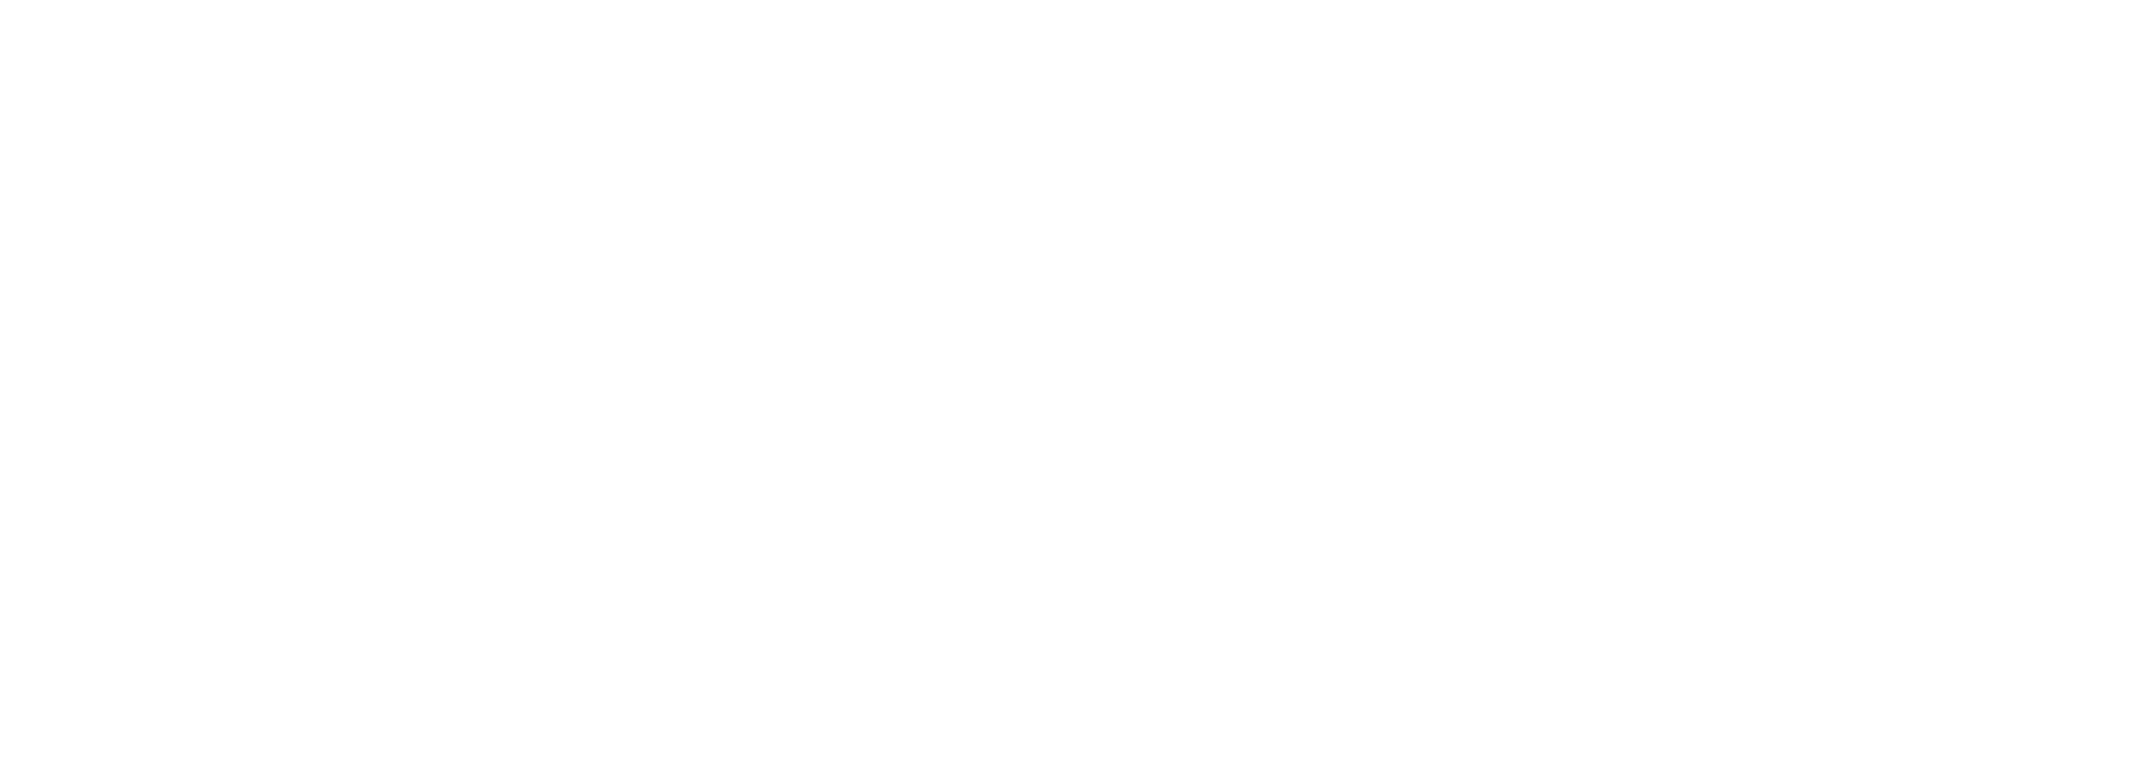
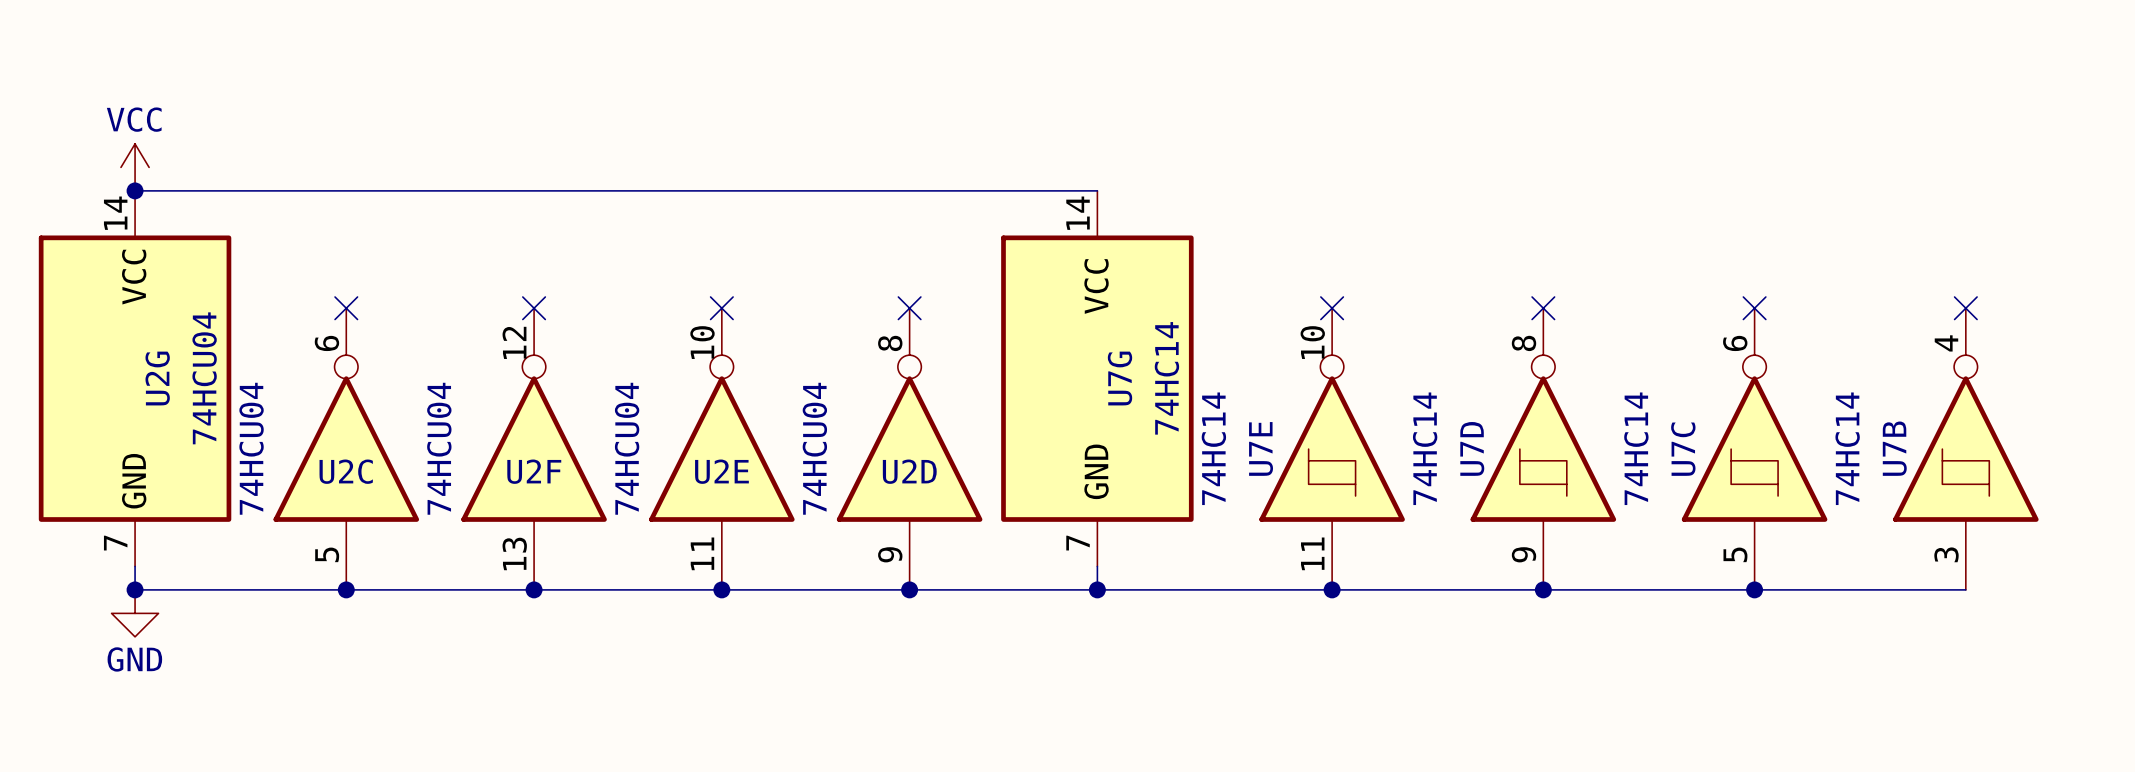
power symbol: none -> VCC (135, 167)
wire: none -> (135, 190) (1097, 190)
junction: none -> (135, 190)
no-connect mark: none -> (346, 308)
no-connect mark: none -> (534, 308)
no-connect mark: none -> (721, 308)
no-connect mark: none -> (909, 308)
no-connect mark: none -> (1332, 308)
no-connect mark: none -> (1543, 308)
no-connect mark: none -> (1754, 308)
no-connect mark: none -> (1965, 308)
U2G: none -> 74HCU04 (135, 378)
U7G: none -> 74HC14 (1097, 378)
U2C: none -> 74HCU04 (346, 449)
U2F: none -> 74HCU04 (534, 449)
U2E: none -> 74HCU04 (721, 449)
U2D: none -> 74HCU04 (909, 449)
U7E: none -> 74HC14 (1332, 449)
U7D: none -> 74HC14 (1543, 449)
U7C: none -> 74HC14 (1754, 449)
U7B: none -> 74HC14 (1965, 449)
wire: none -> (135, 566) (135, 589) (1965, 589)
wire: none -> (1097, 566) (1097, 589)
junction: none -> (135, 589)
junction: none -> (346, 589)
junction: none -> (534, 589)
junction: none -> (721, 589)
junction: none -> (909, 589)
junction: none -> (1097, 589)
junction: none -> (1332, 589)
junction: none -> (1543, 589)
junction: none -> (1754, 589)
power symbol: none -> GND (135, 613)

